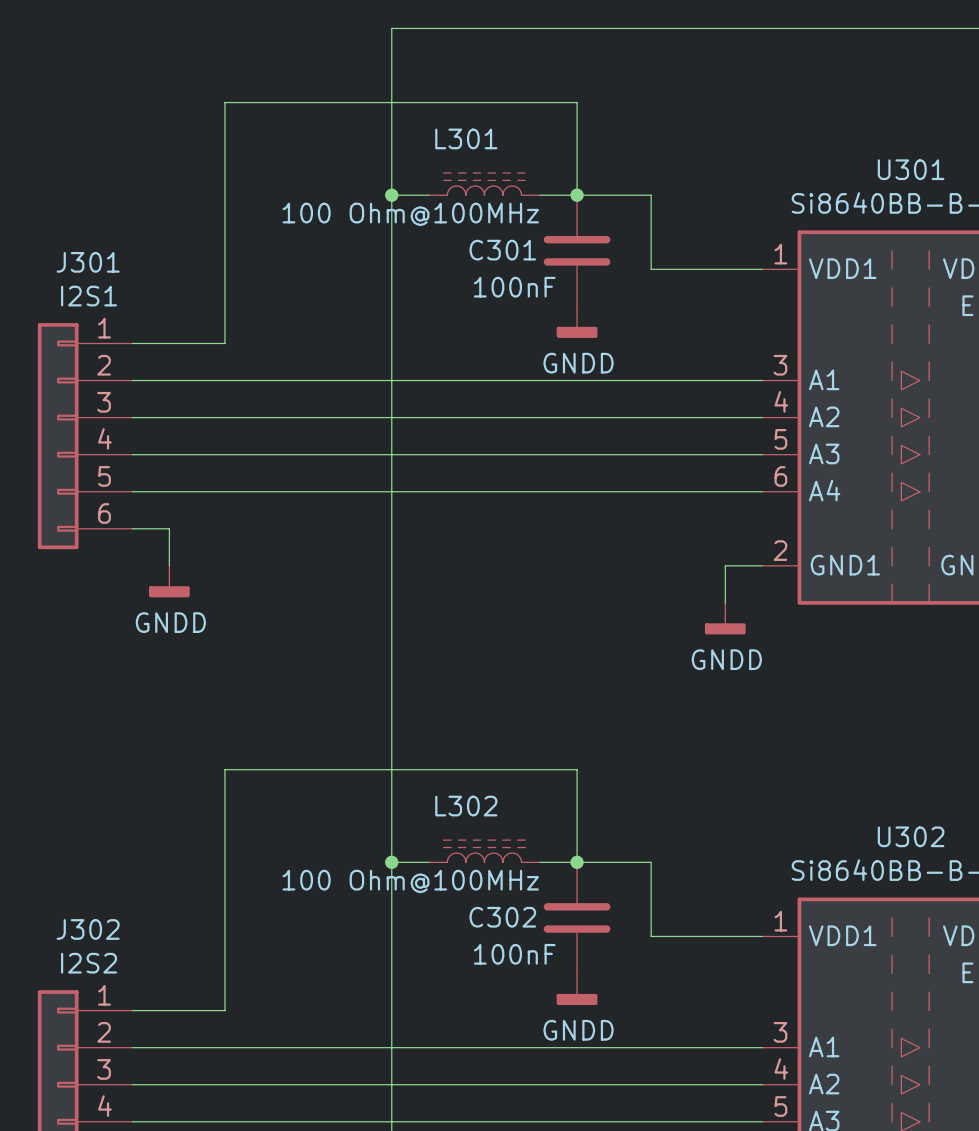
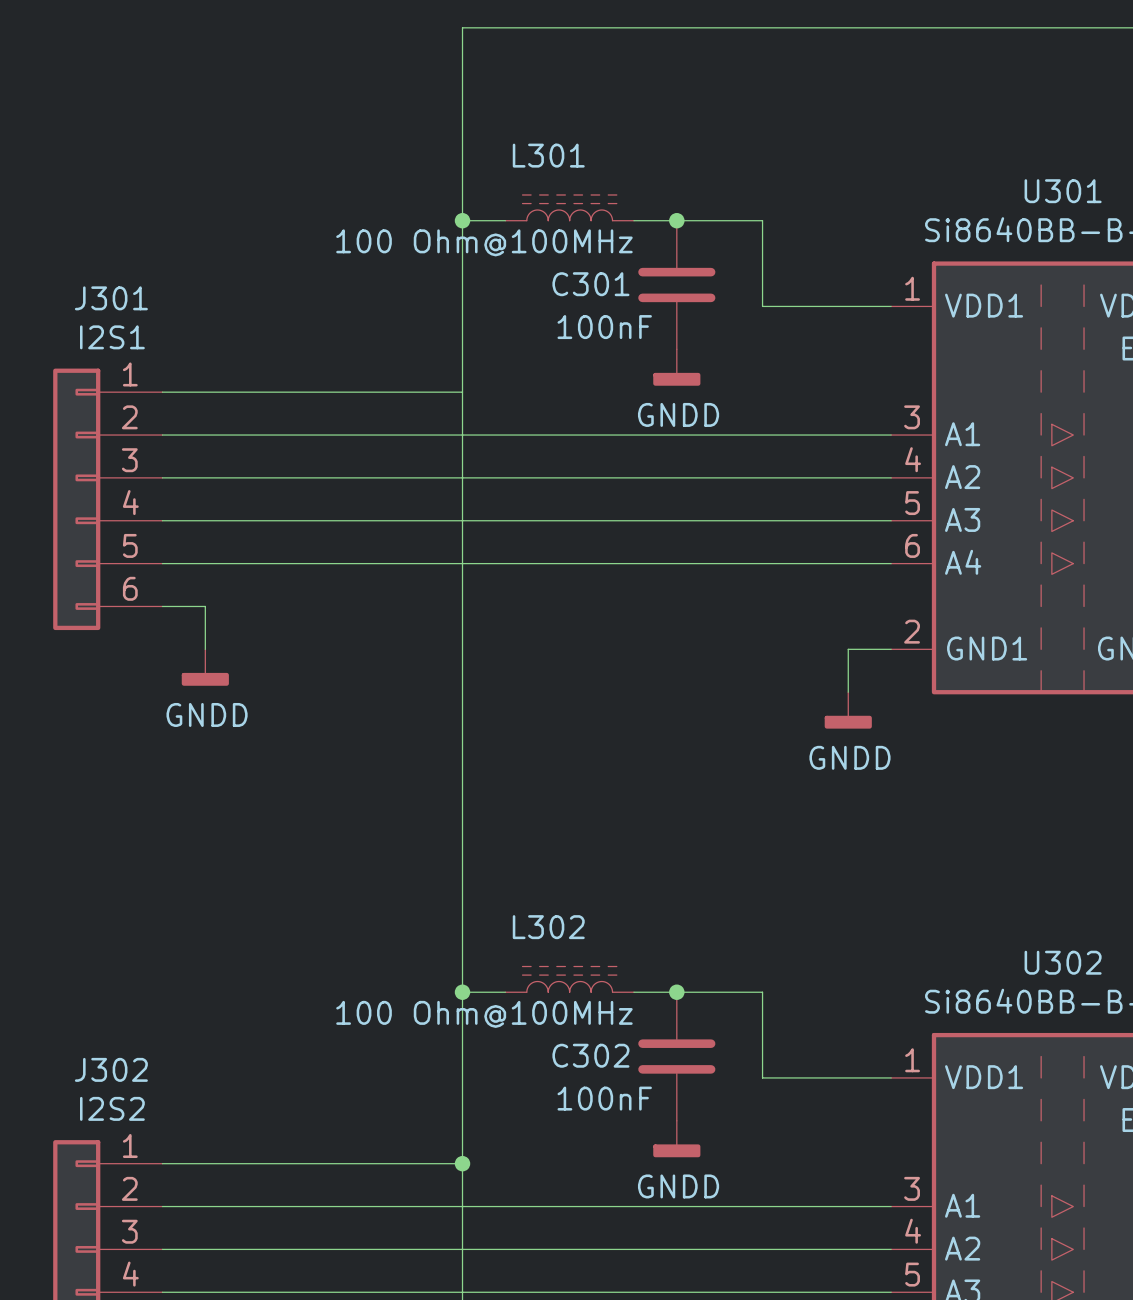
wire: (577, 195) (577, 102) (224, 102) (224, 343) -> (462, 392) (269, 392)
wire: (577, 862) (577, 769) (224, 769) (224, 1010) -> (462, 1163) (269, 1163)
junction: none -> (462, 1163)

